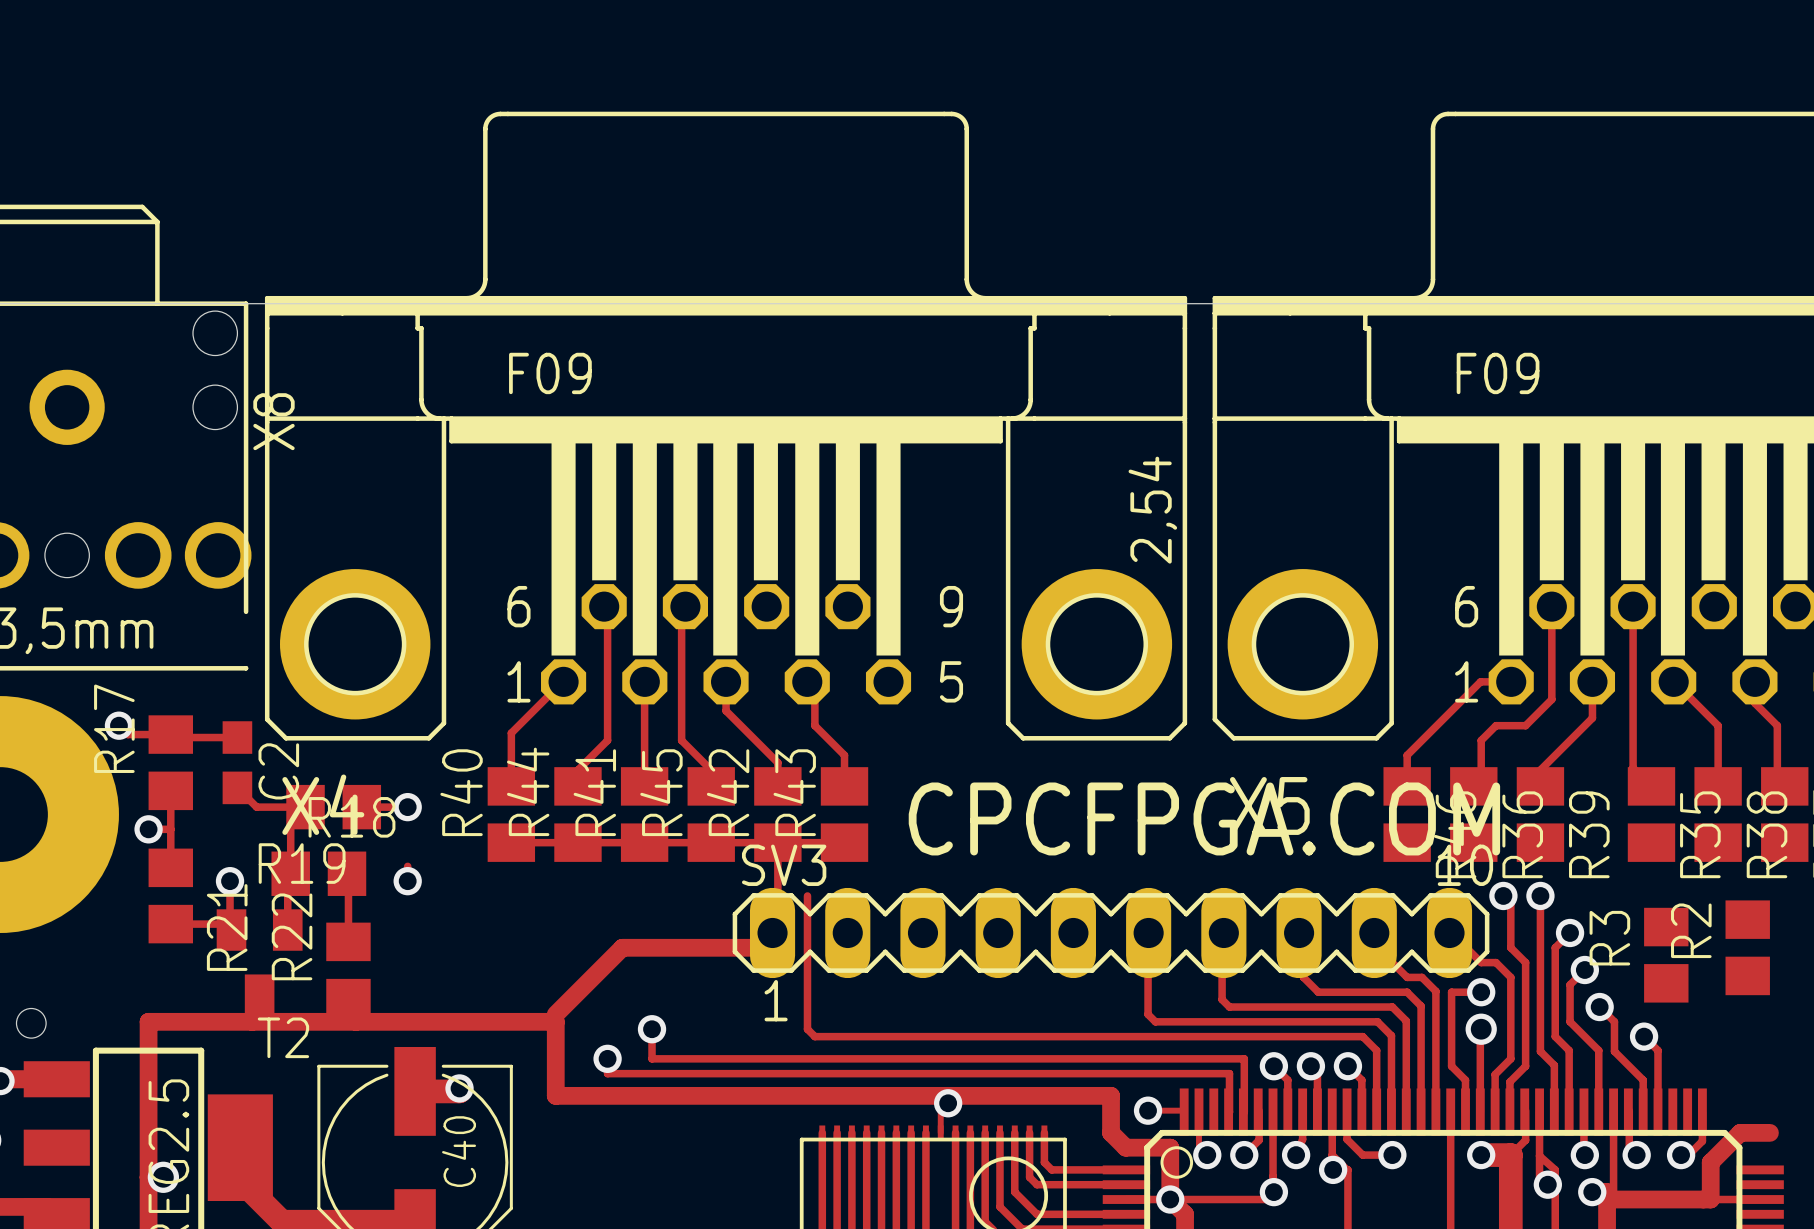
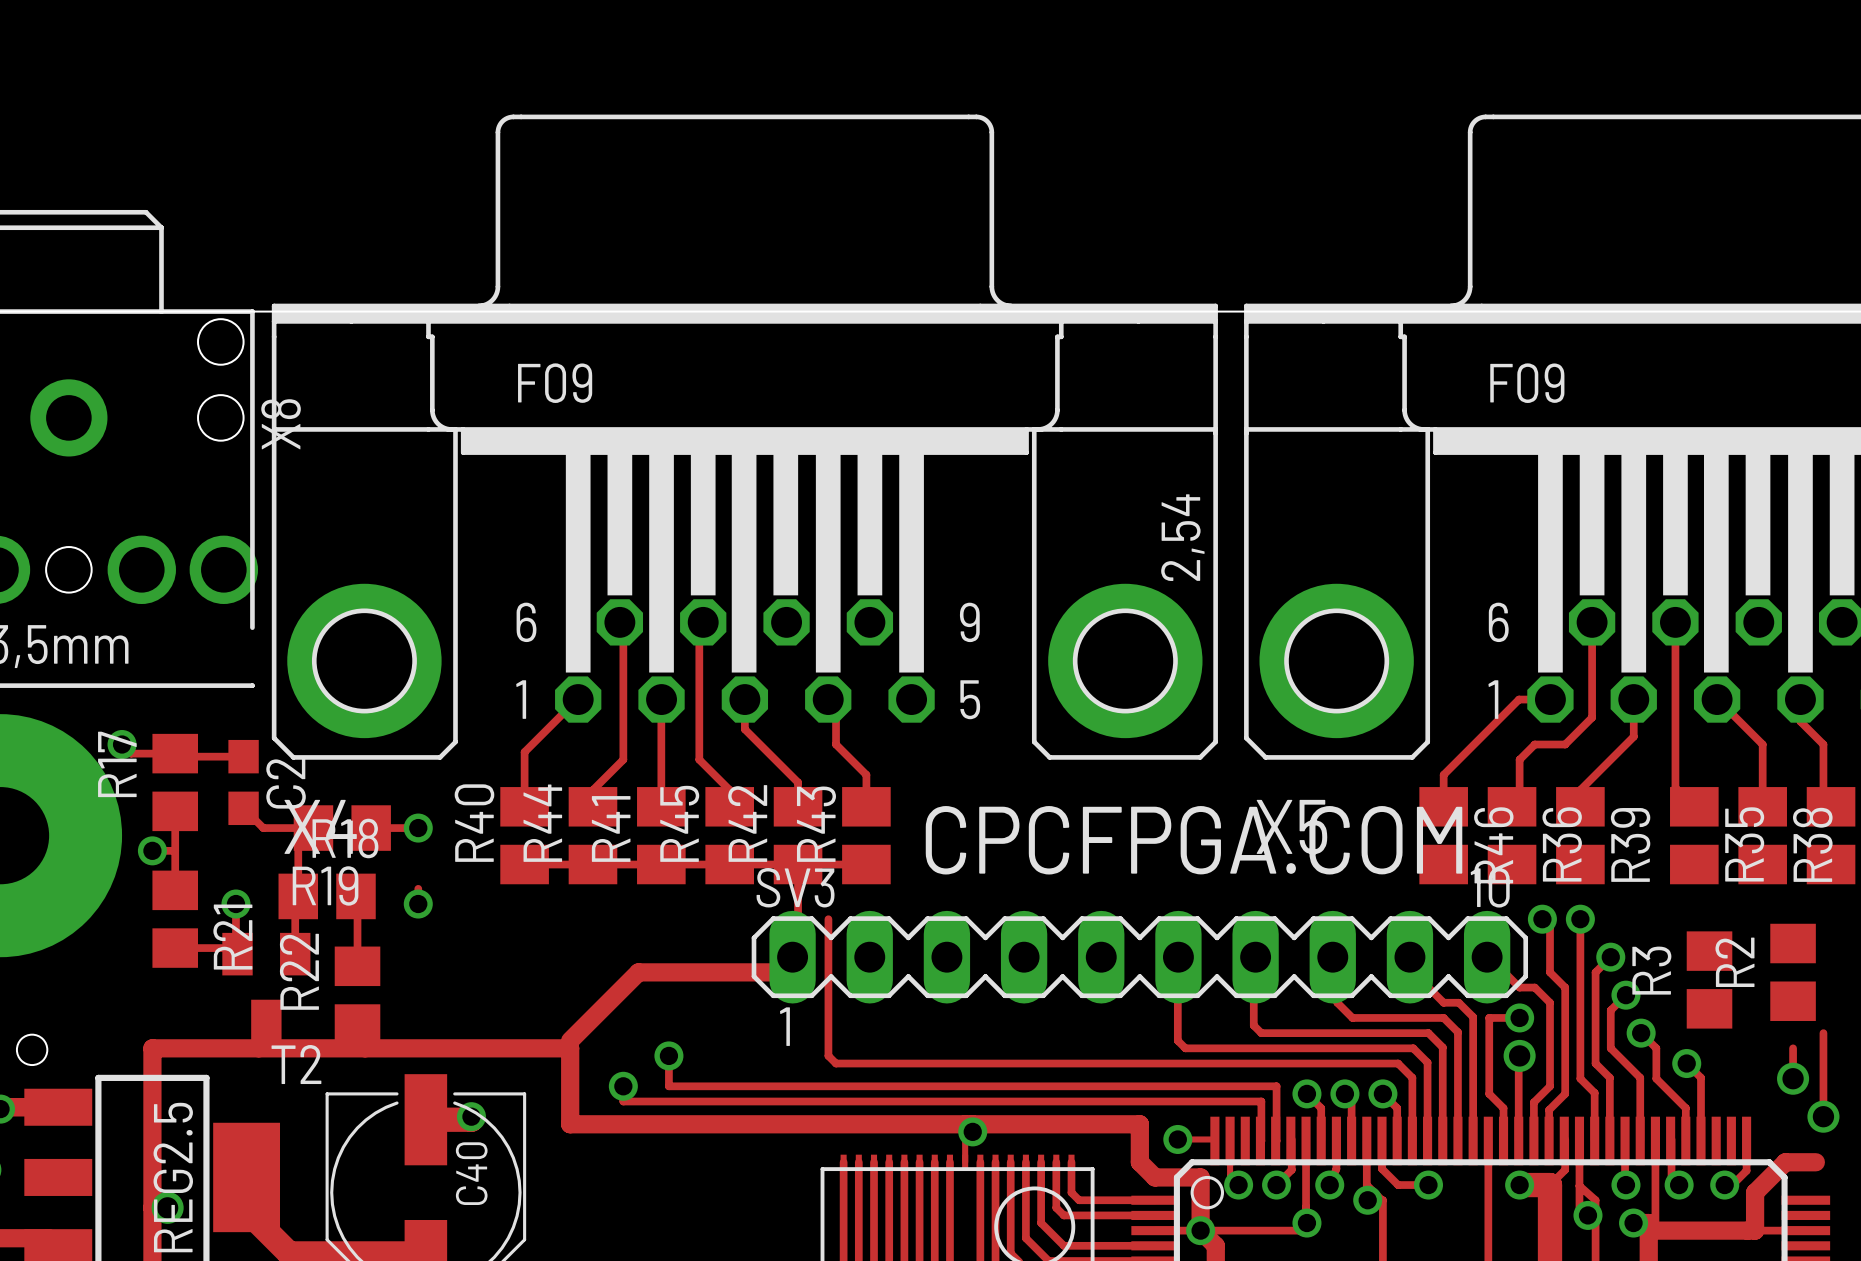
track: none -> (1823, 1033) (1823, 1116)
track: none -> (1793, 1048) (1793, 1078)
via: none -> (1793, 1078)
via: none -> (1823, 1116)

